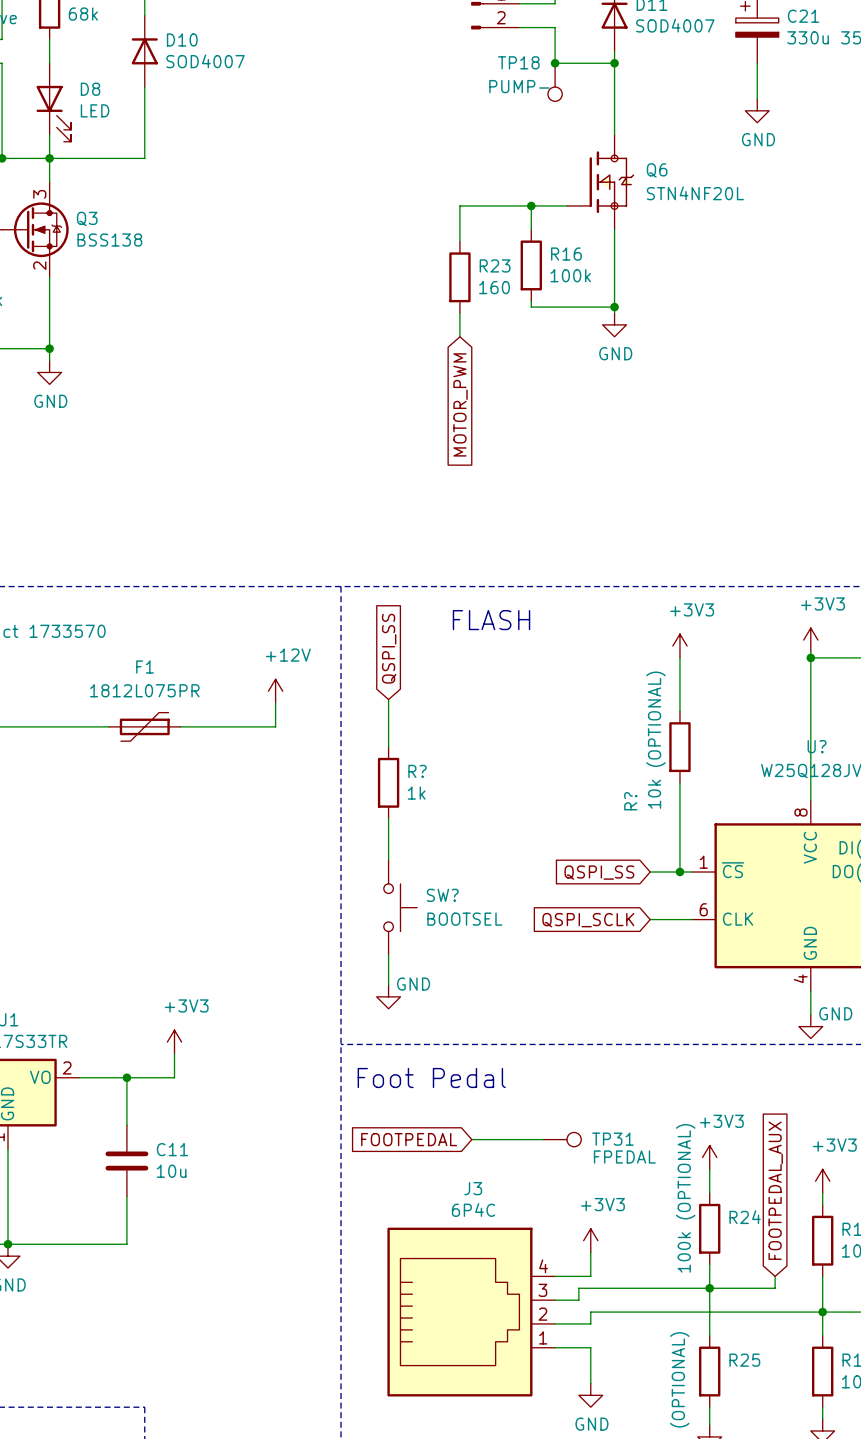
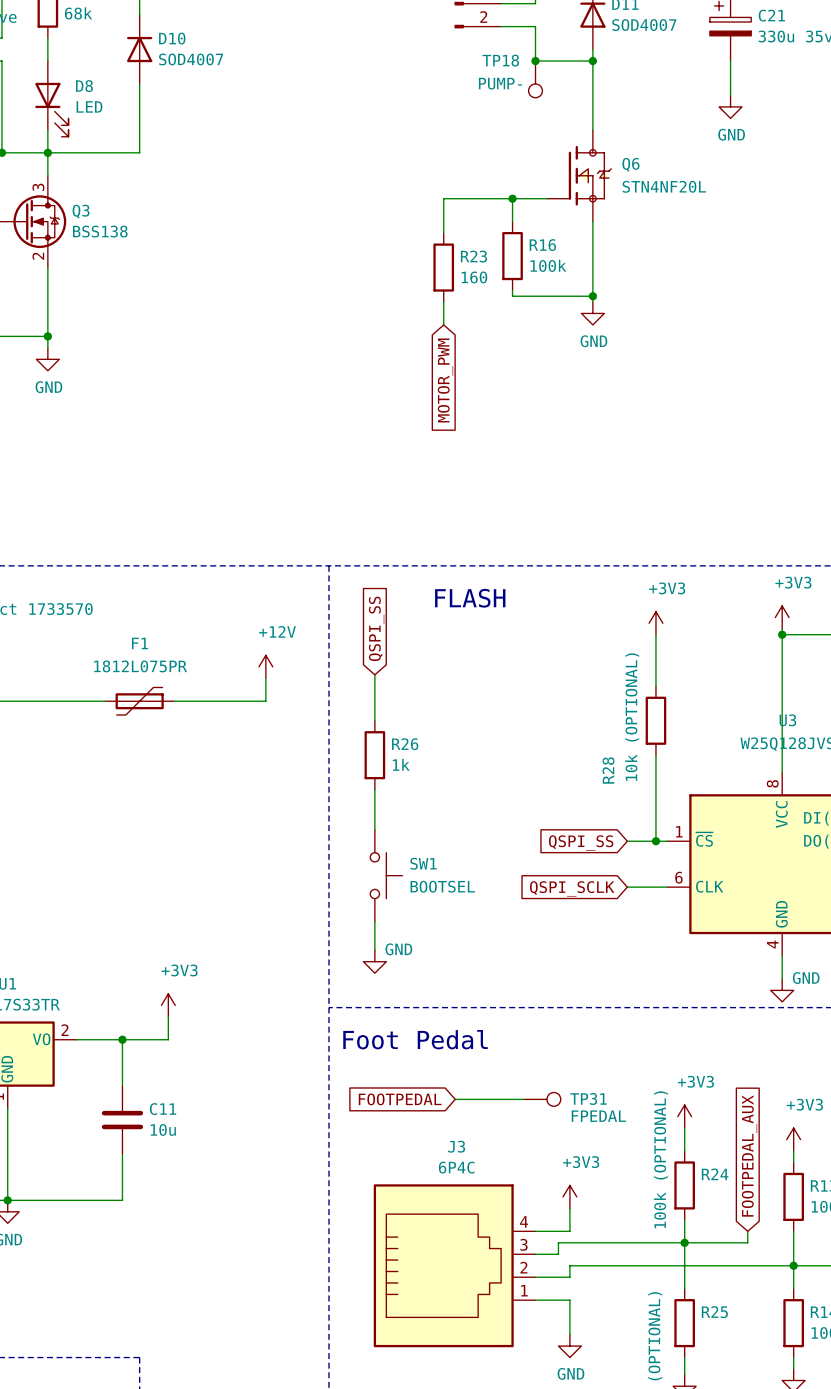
U? name: U? (817, 746) -> U3 (787, 720)
R? name: R? (417, 771) -> R26 (405, 744)
R? name: R? (630, 801) -> R28 (608, 770)
SW? name: SW? (442, 895) -> SW1 (423, 863)

